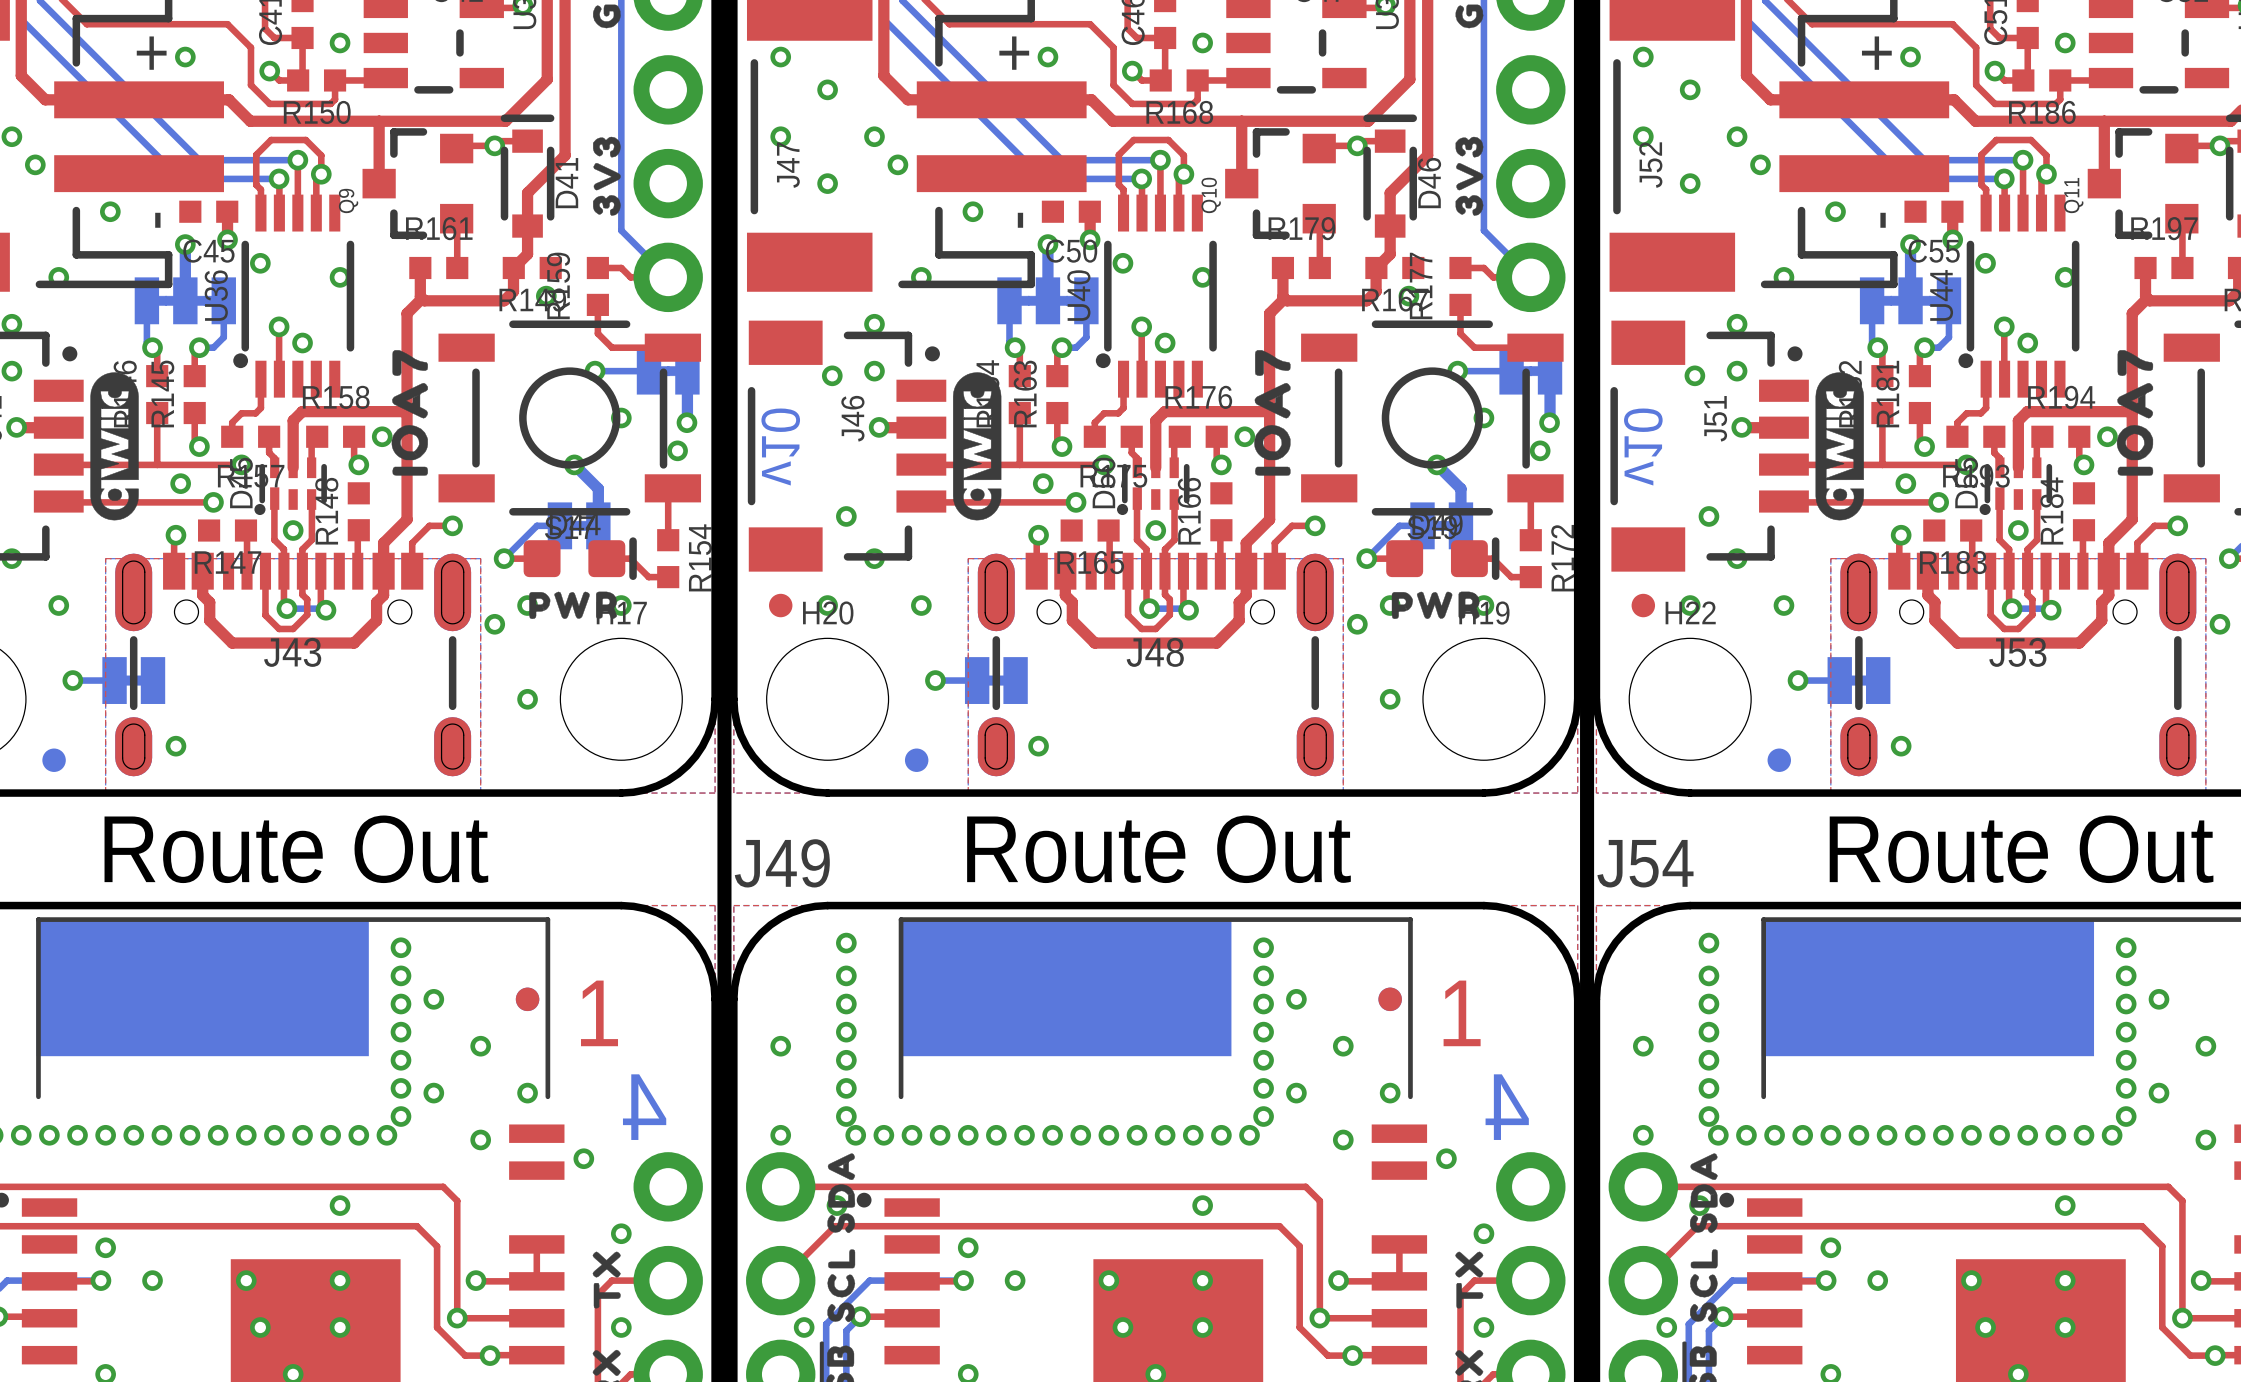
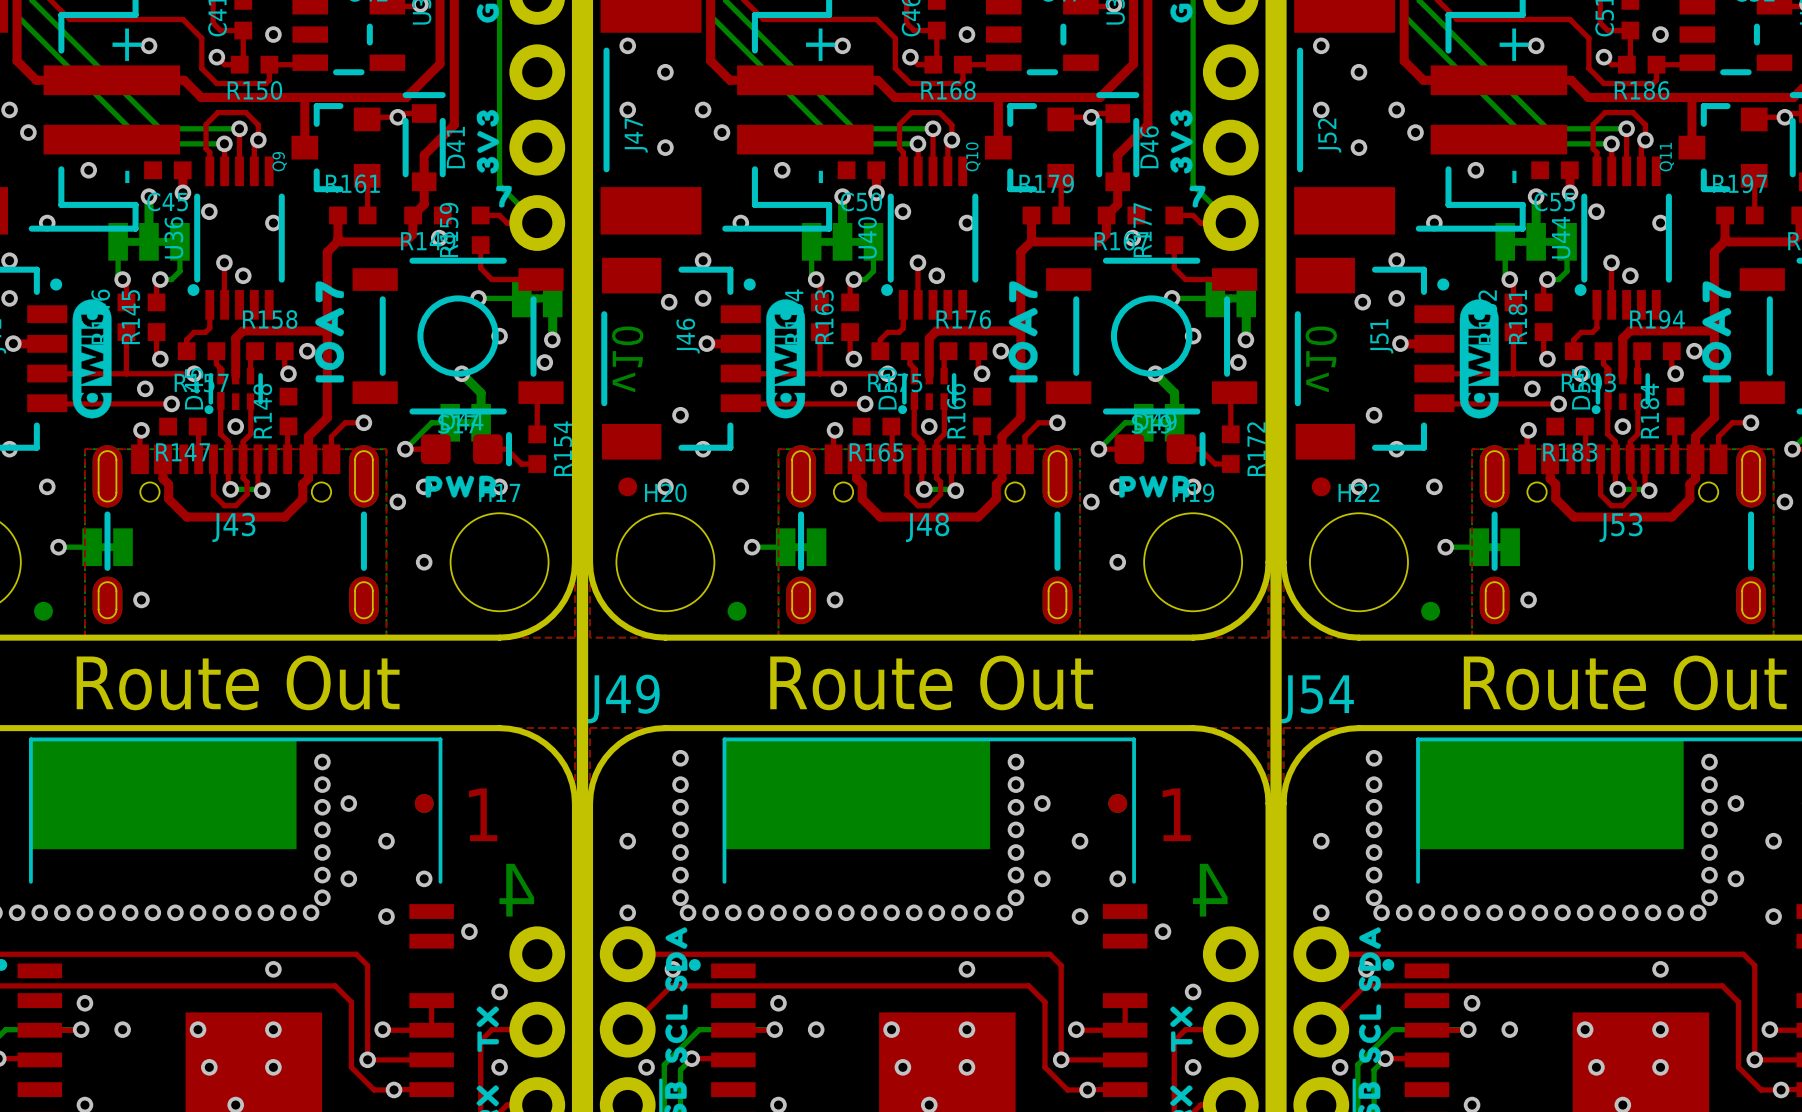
drawing: none -> [496, 185, 512, 208]
drawing: none -> [1189, 185, 1206, 208]

